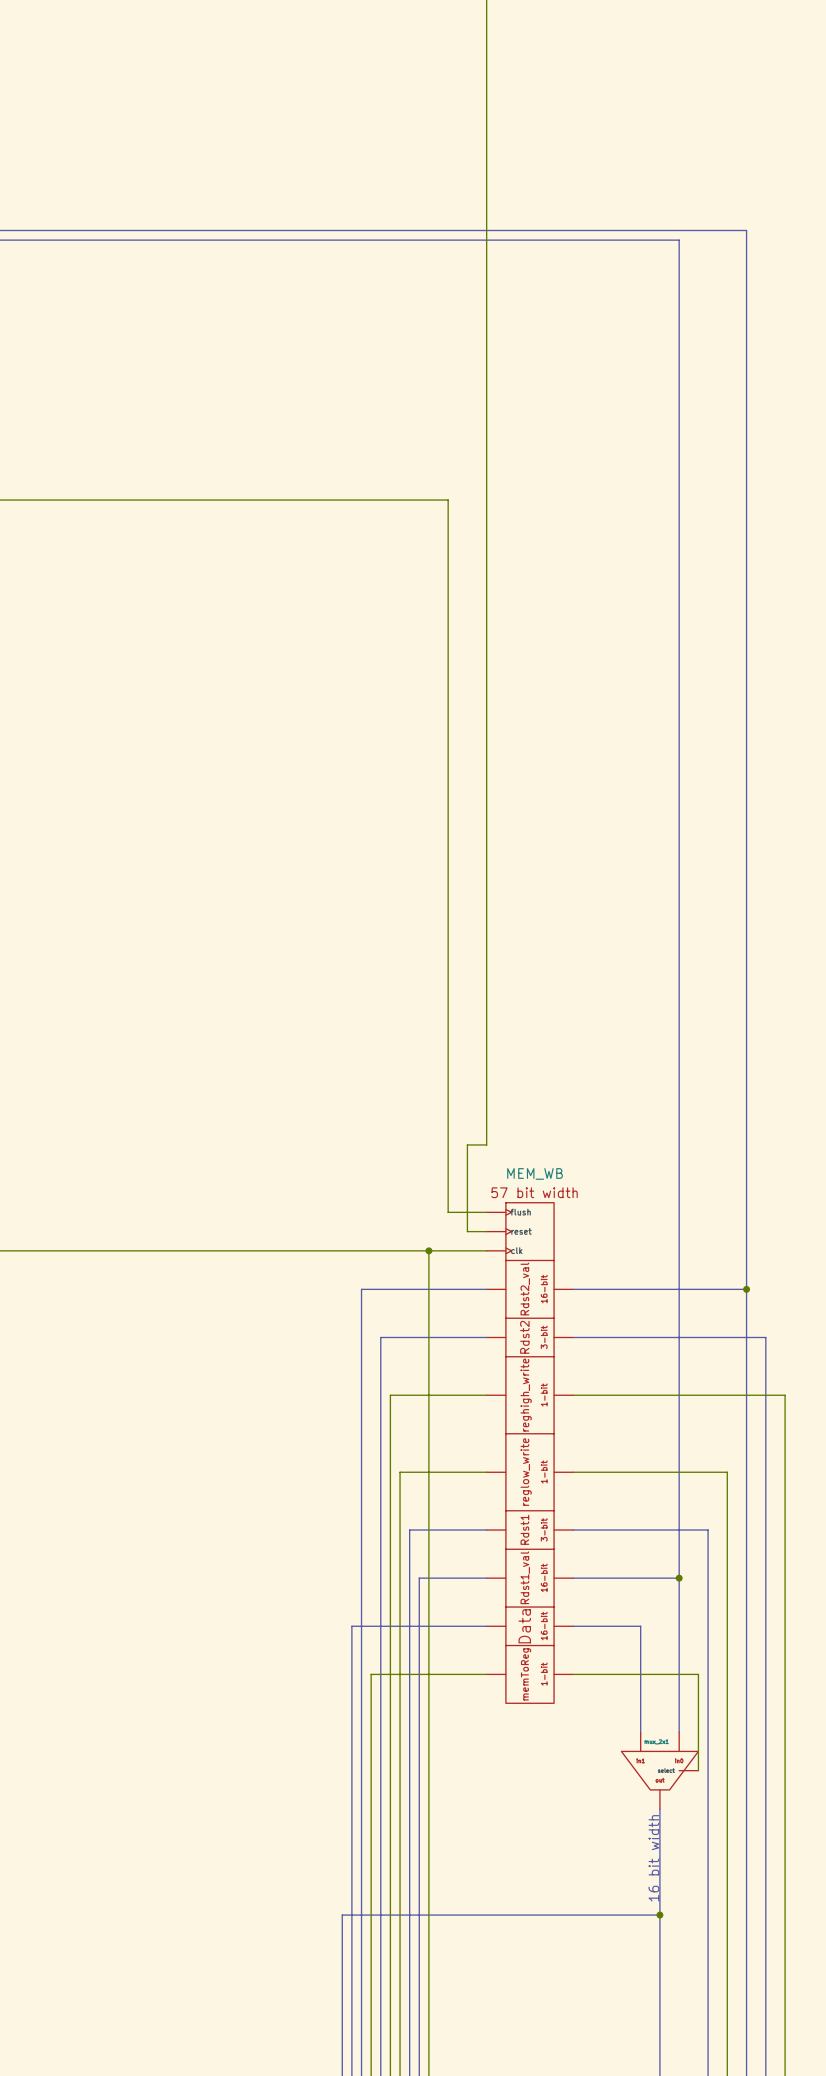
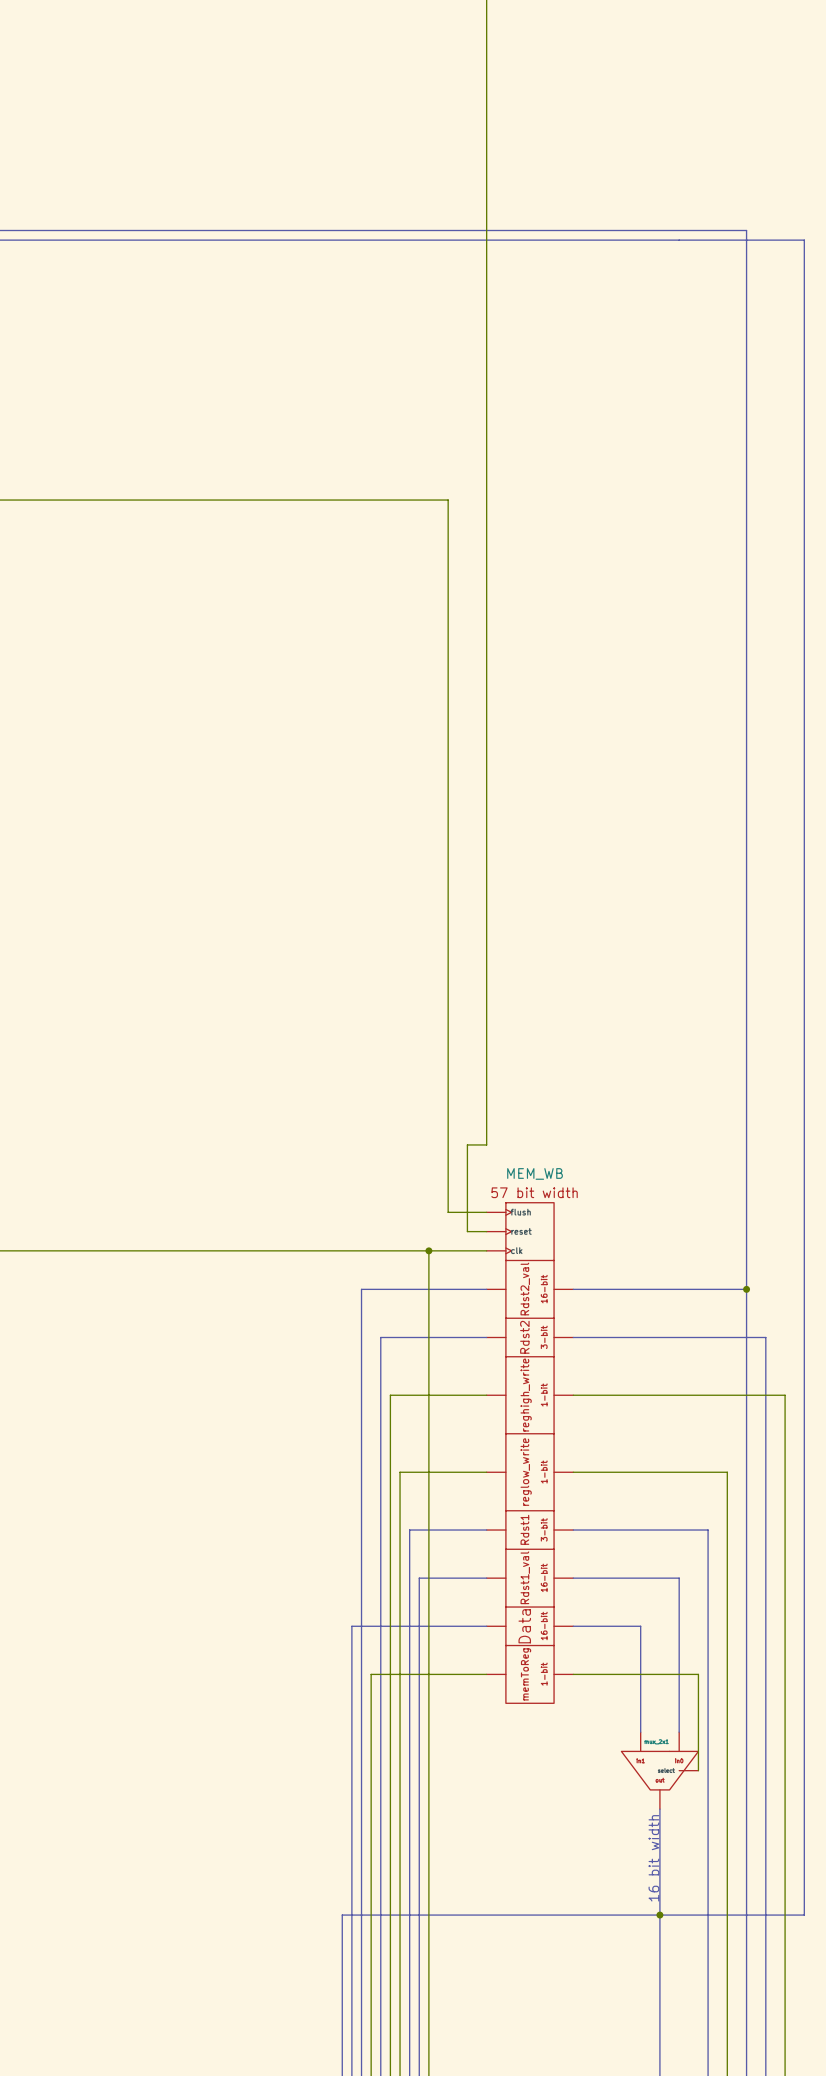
bus: (679, 240) (679, 1578) -> (679, 240) (804, 240) (804, 1915) (659, 1915)
junction: (679, 1578) -> none

